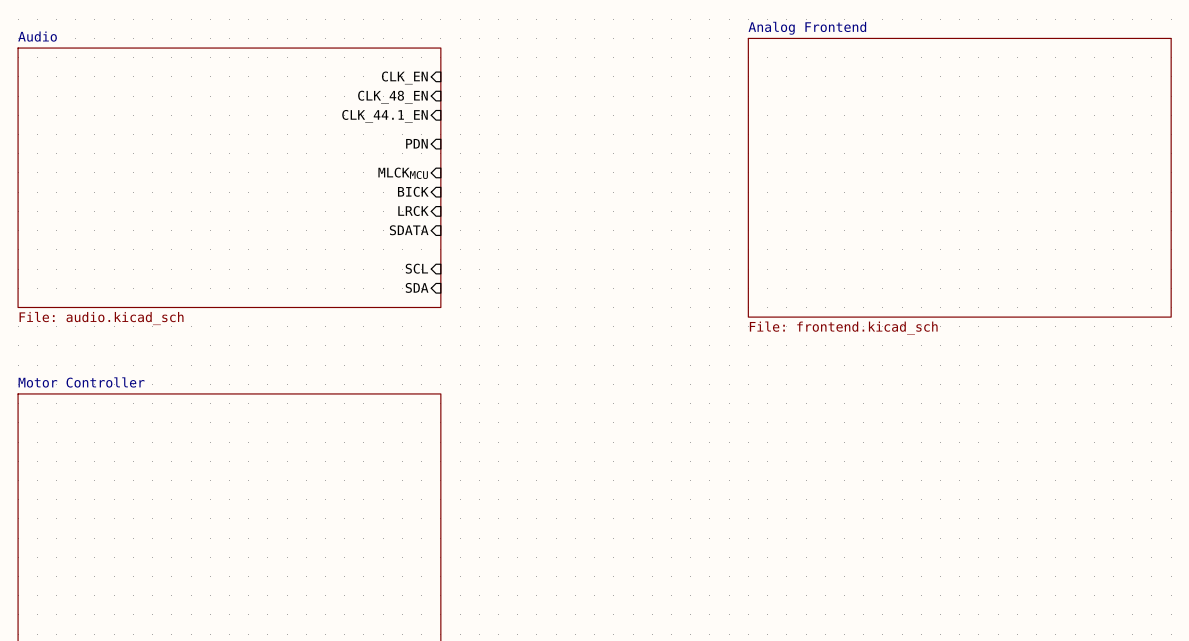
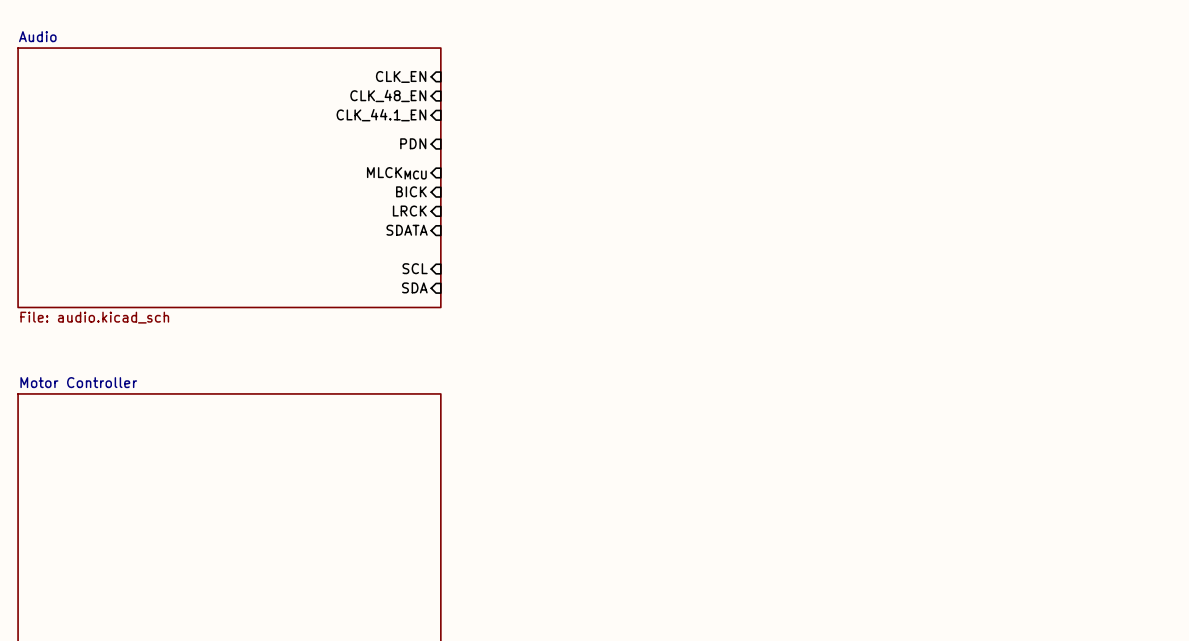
sheet Analog Frontend: File: frontend.kicad_sch (959, 177) -> none

